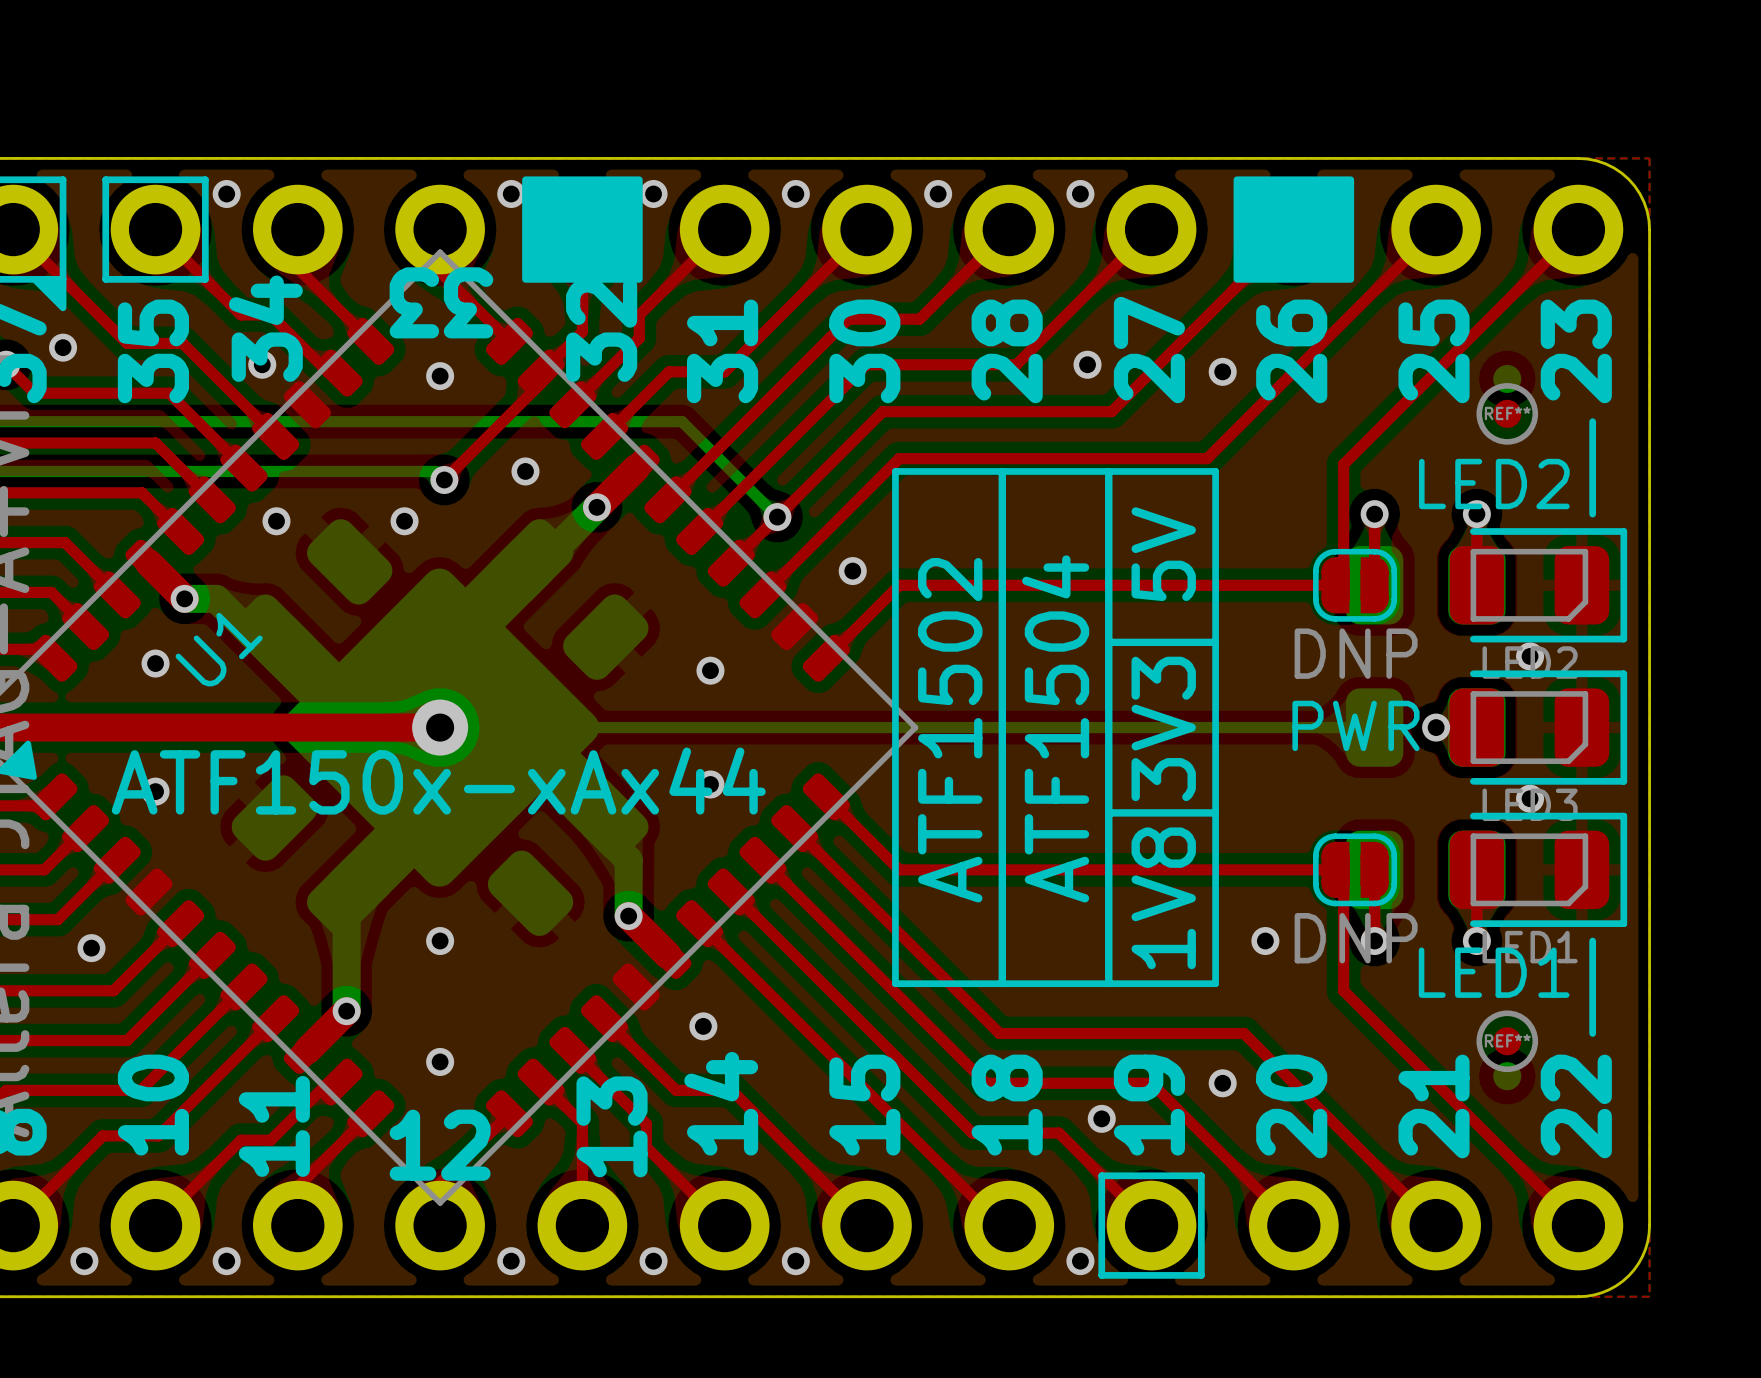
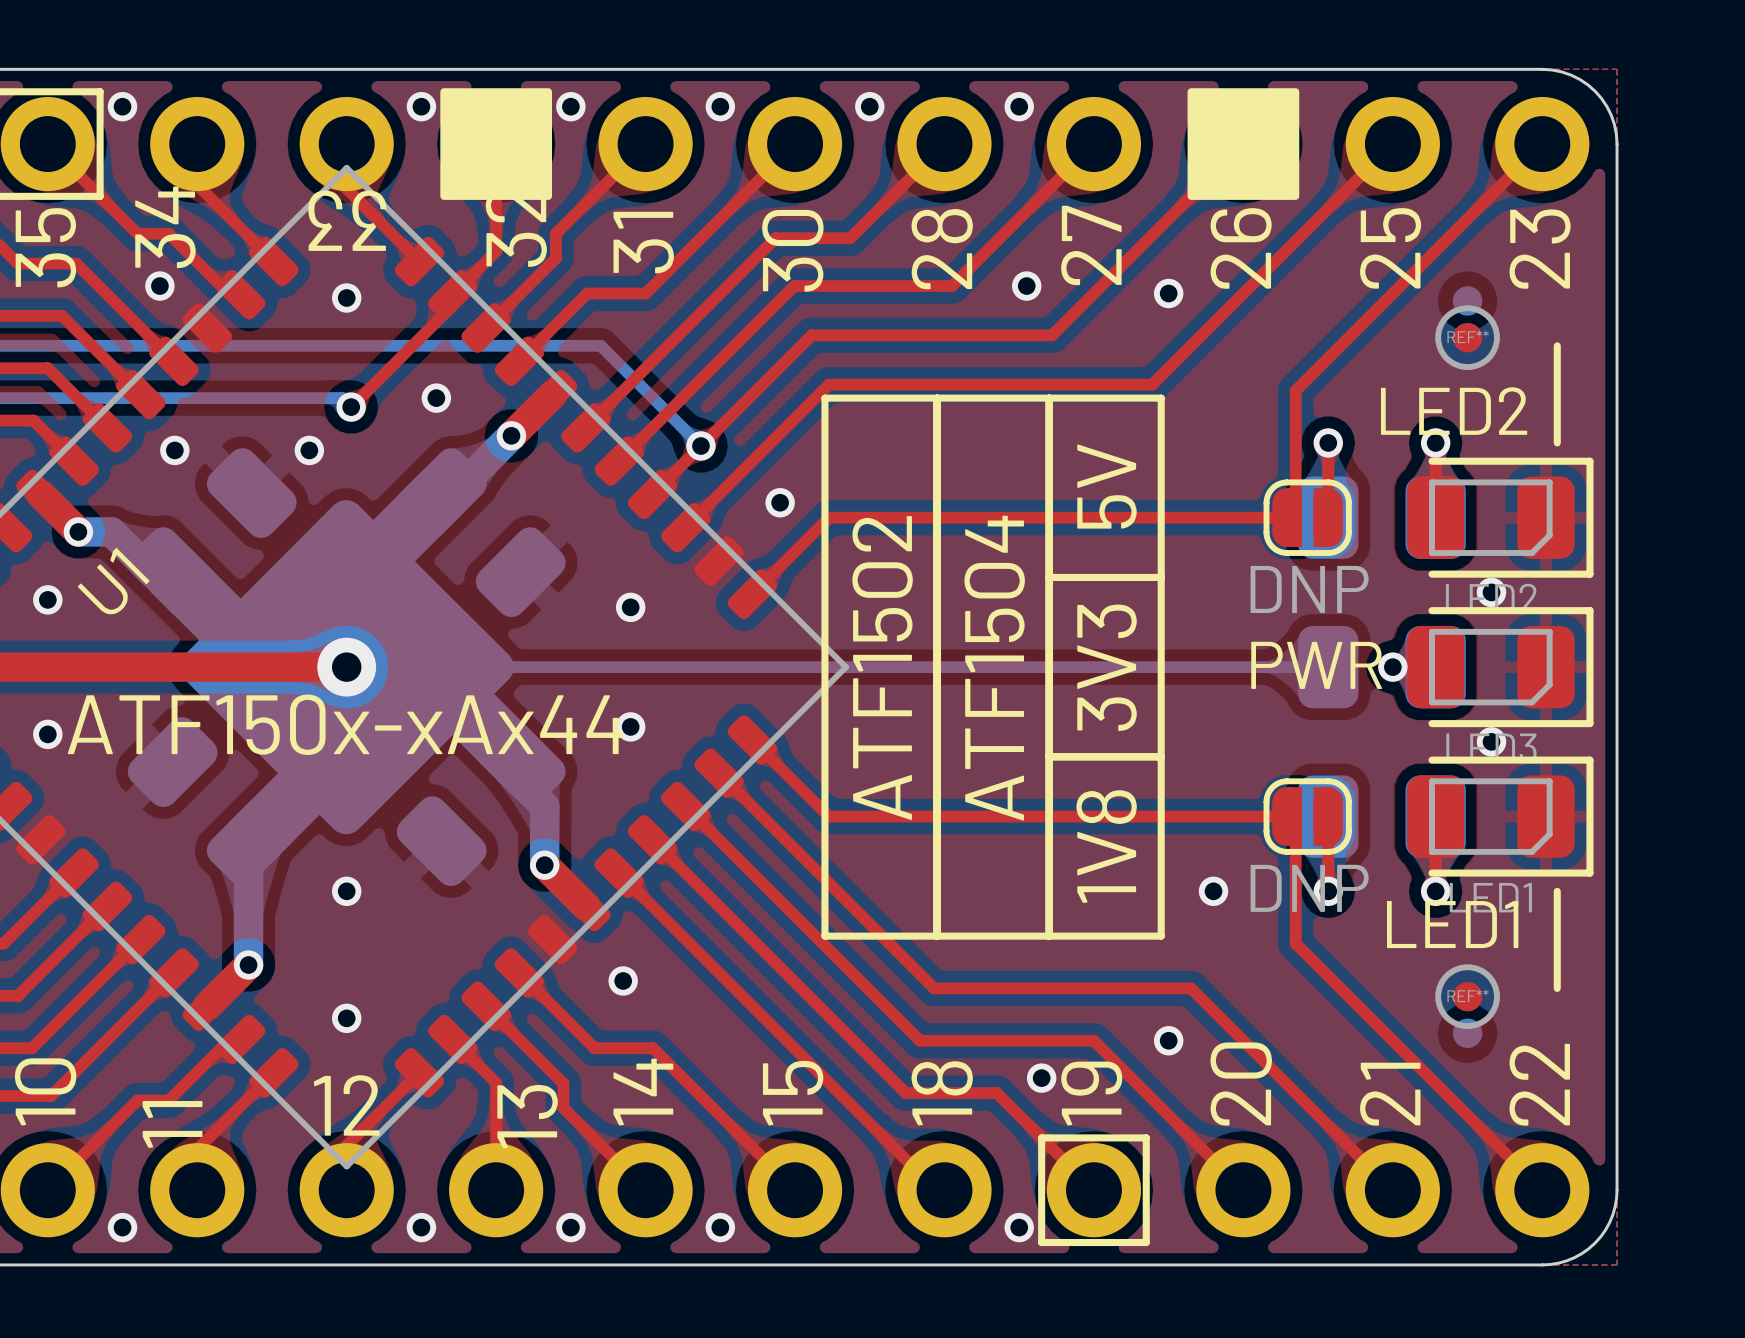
drawing shape: [522, 176, 643, 283] -> [440, 88, 553, 200]
drawing shape: [1233, 176, 1355, 283] -> [1187, 88, 1300, 200]

